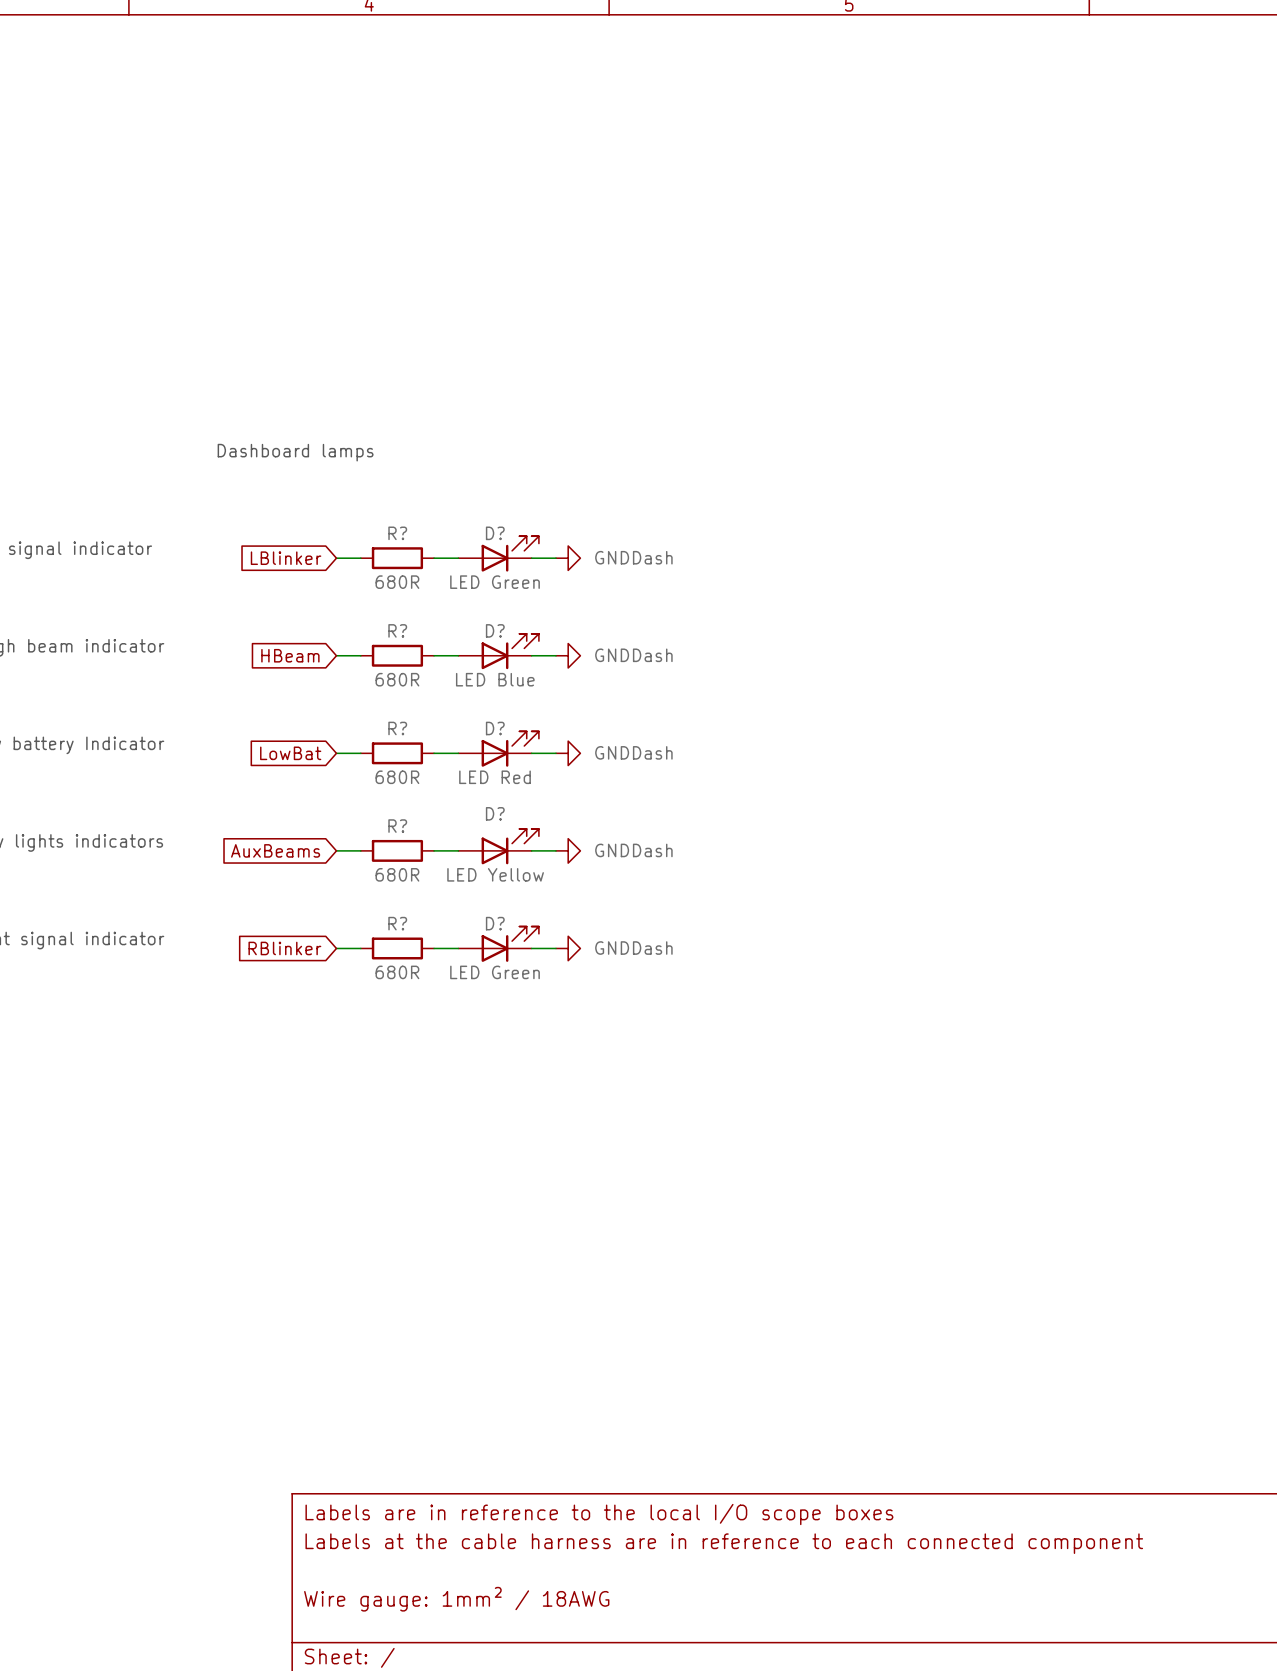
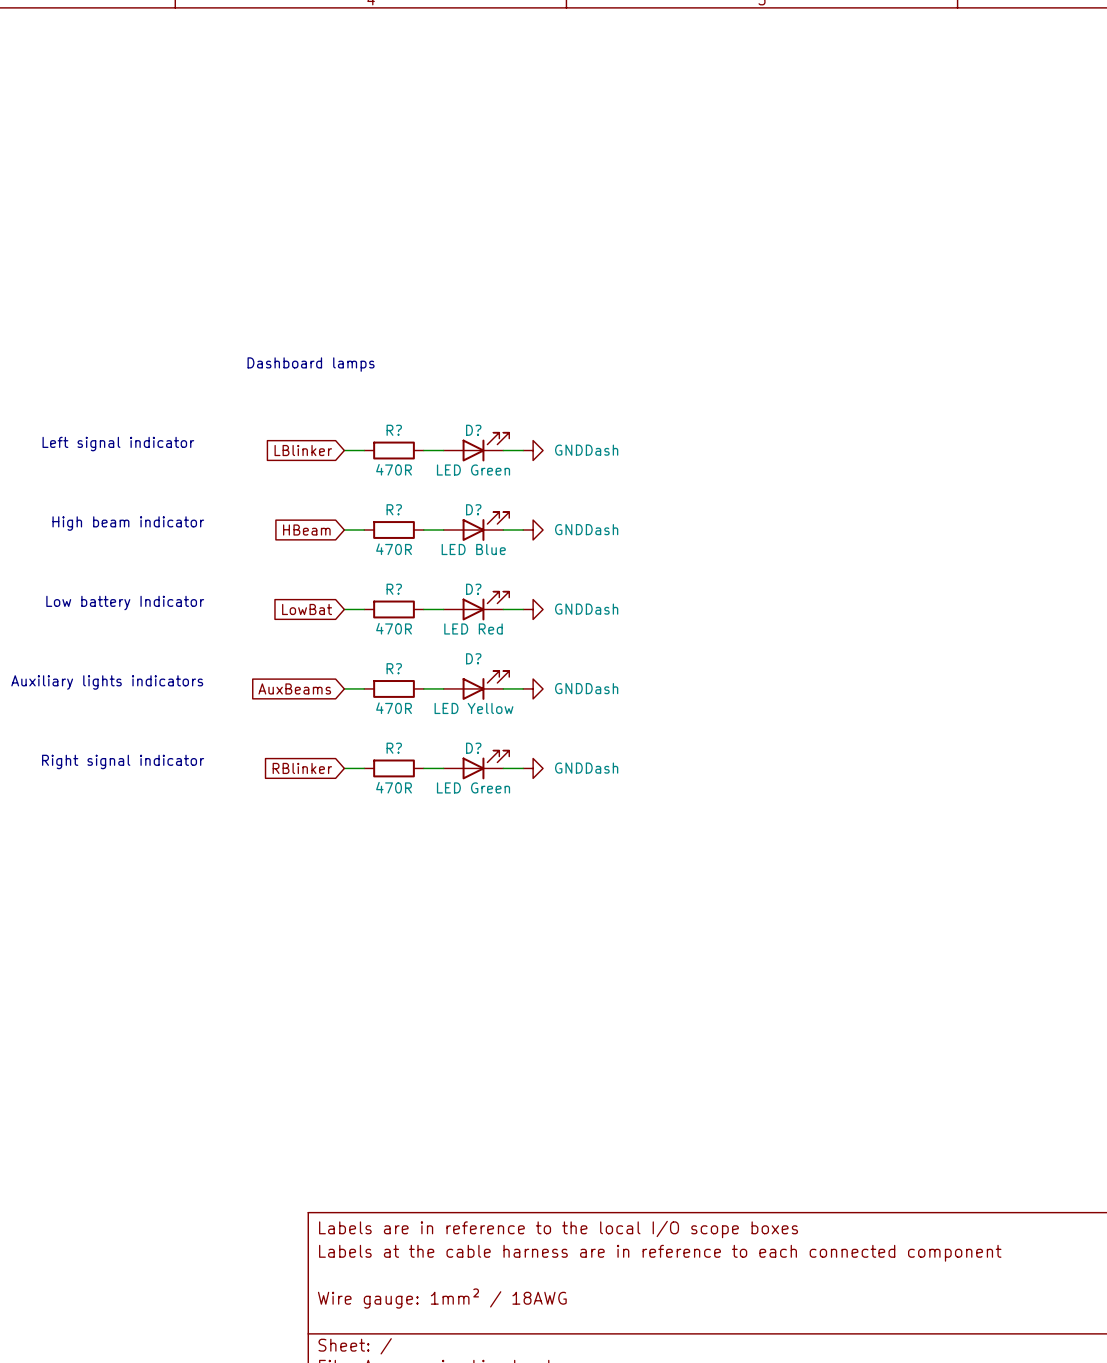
R? value: 680R (397, 582) -> 470R (394, 469)
R? value: 680R (397, 679) -> 470R (394, 549)
R? value: 680R (397, 777) -> 470R (394, 628)
R? value: 680R (397, 874) -> 470R (394, 708)
R? value: 680R (397, 972) -> 470R (394, 787)

